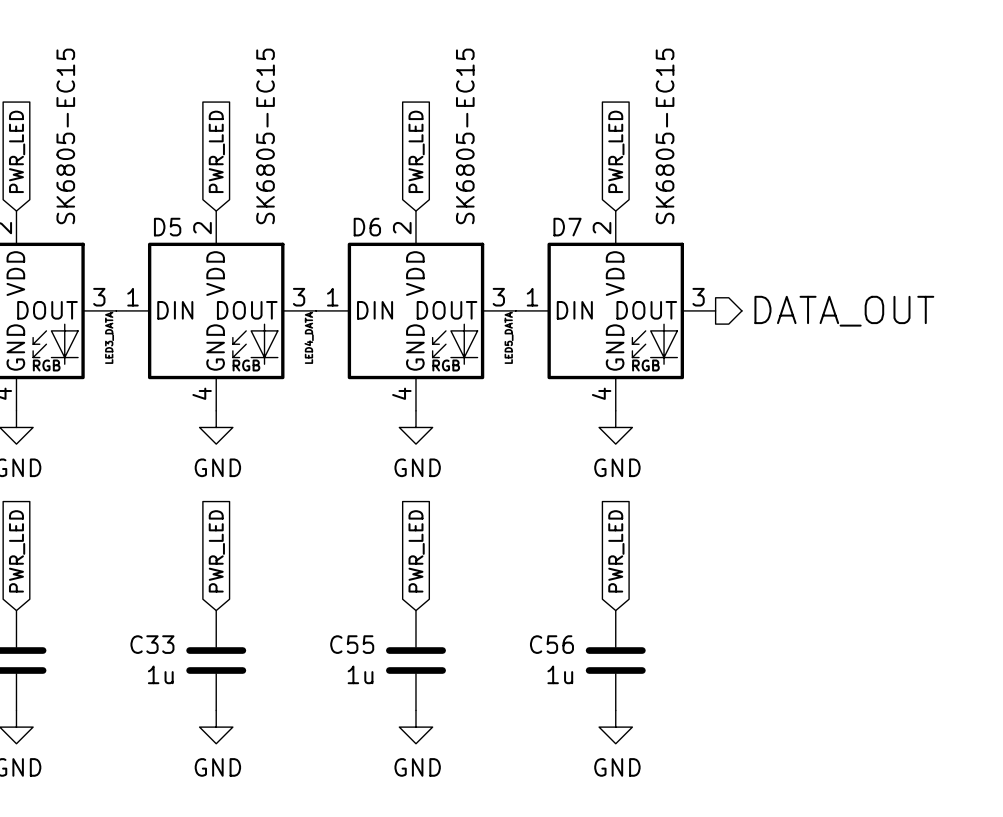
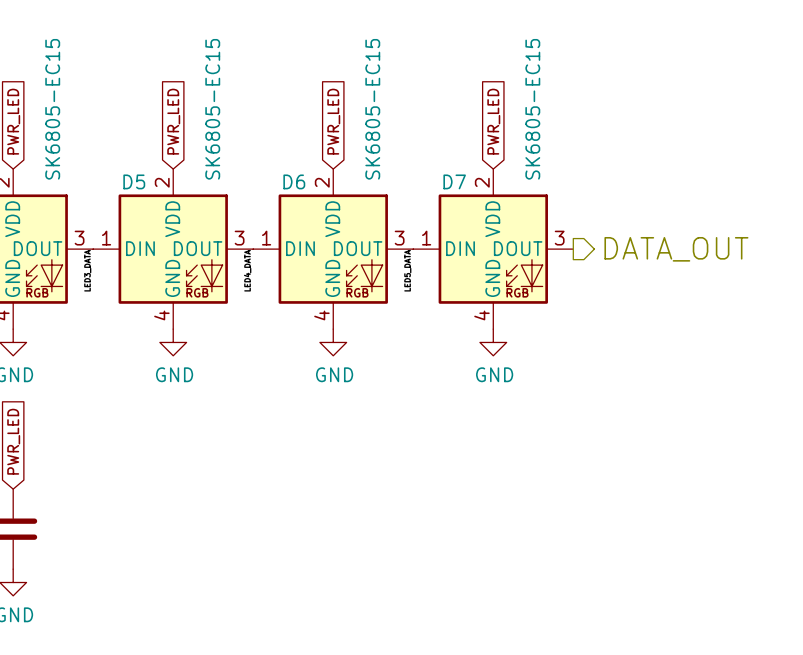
global label: PWR_LED (216, 551) -> none
global label: PWR_LED (416, 551) -> none
global label: PWR_LED (616, 551) -> none
C33: 1u (216, 660) -> none
C55: 1u (415, 660) -> none
C56: 1u (615, 660) -> none
power symbol: GND (216, 727) -> none
power symbol: GND (415, 727) -> none
power symbol: GND (615, 727) -> none

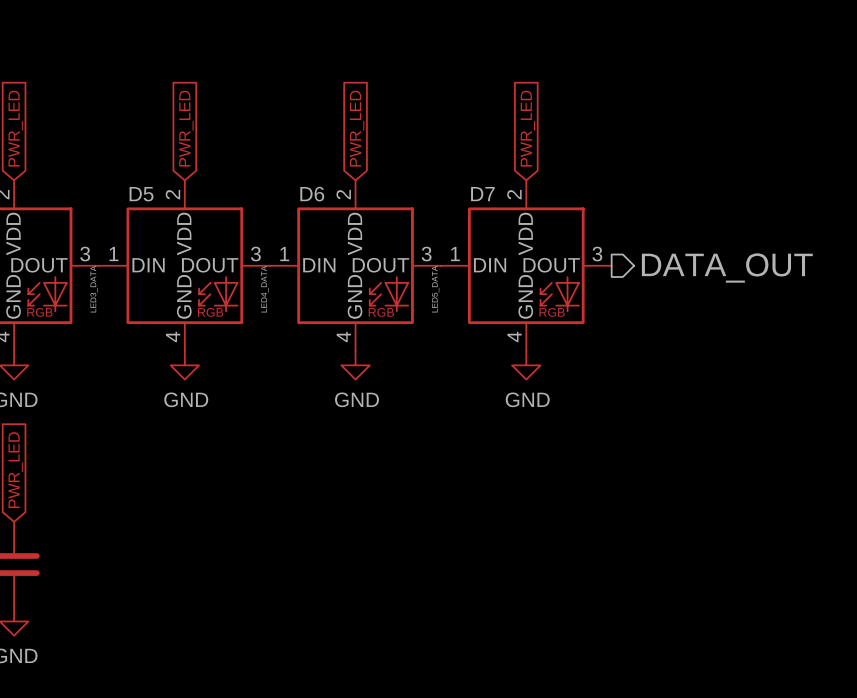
part value: SK6805-EC15 (52, 109) -> none
D5 value: SK6805-EC15 (212, 109) -> none
D6 value: SK6805-EC15 (372, 109) -> none
D7 value: SK6805-EC15 (532, 109) -> none

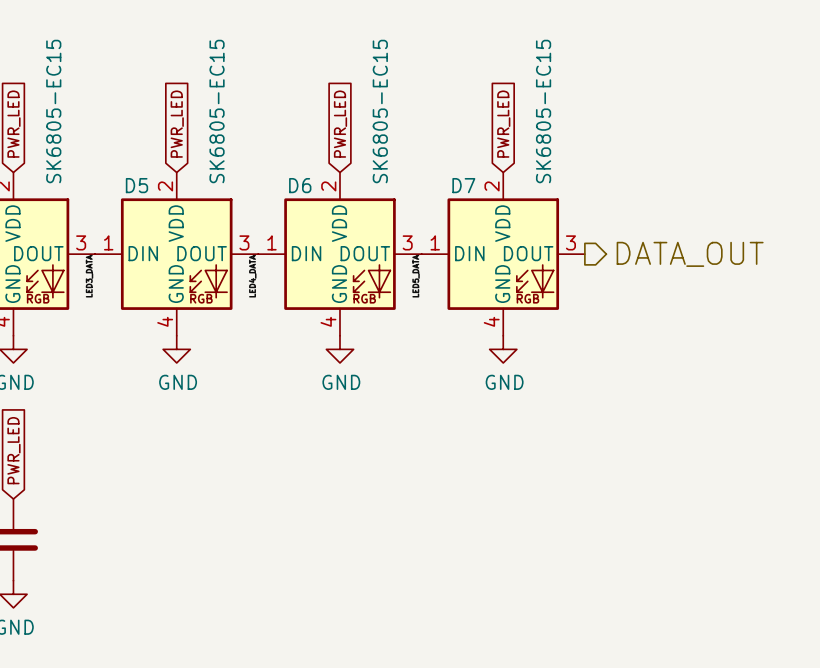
part value: none -> SK6805-EC15 (53, 111)
D5 value: none -> SK6805-EC15 (217, 111)
D6 value: none -> SK6805-EC15 (380, 111)
D7 value: none -> SK6805-EC15 (543, 111)

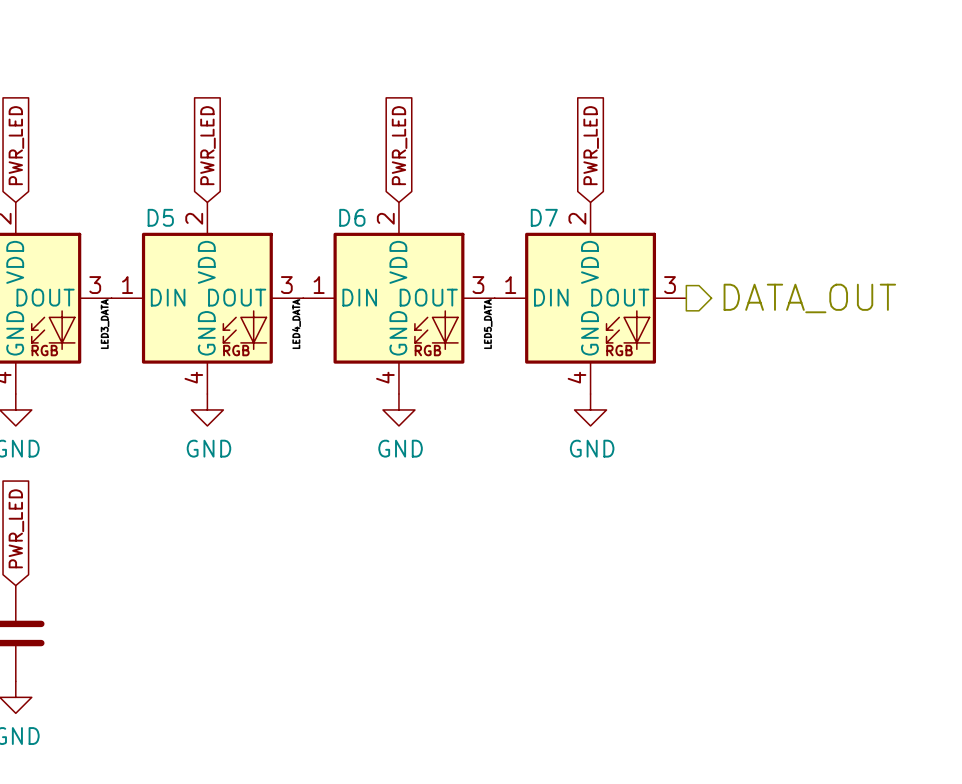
part value: SK6805-EC15 (53, 111) -> none
D5 value: SK6805-EC15 (217, 111) -> none
D6 value: SK6805-EC15 (380, 111) -> none
D7 value: SK6805-EC15 (543, 111) -> none

